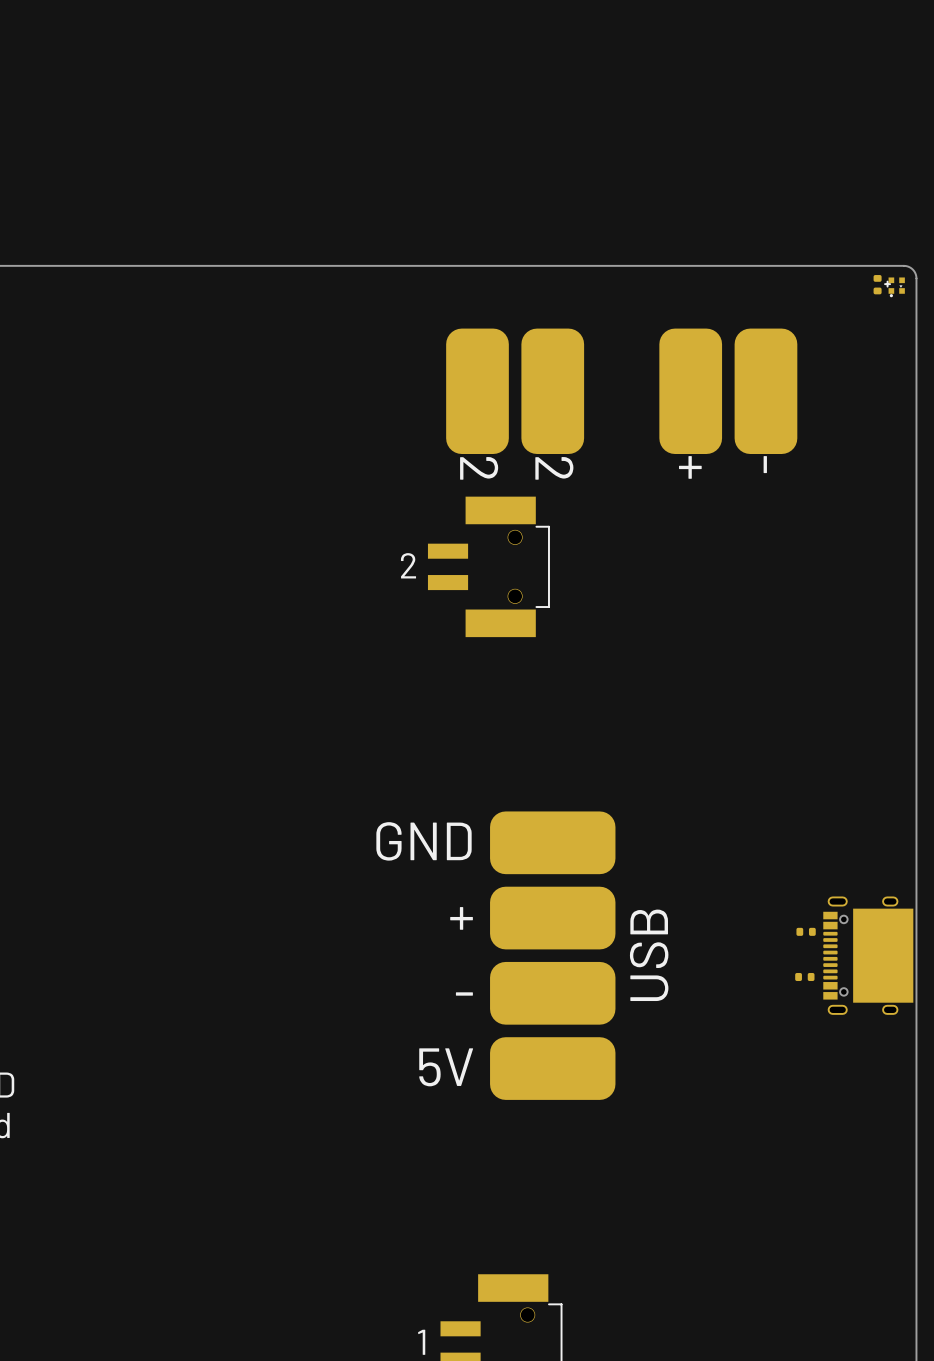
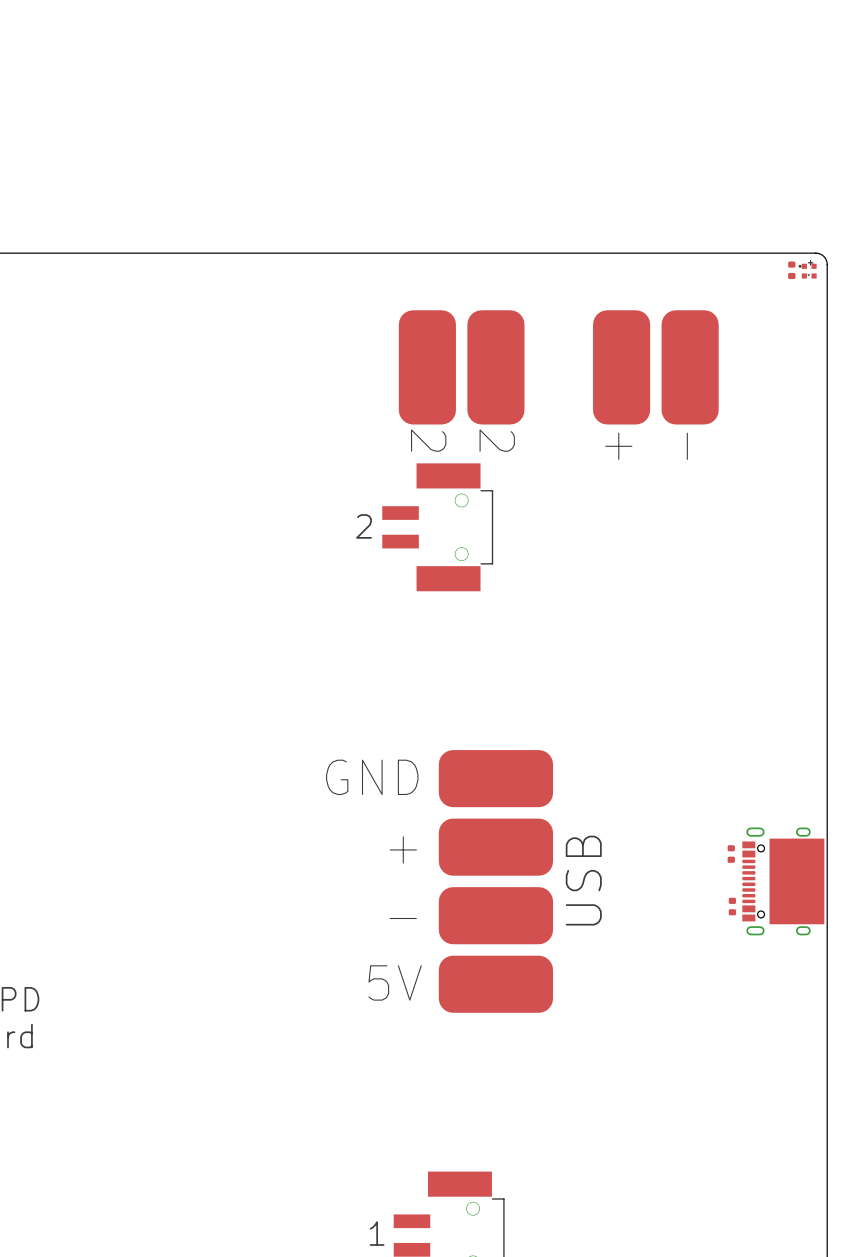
part rotation: 0° (894, 287) -> 90° clockwise (807, 269)
part rotation: 0° (806, 931) -> 90° clockwise (731, 854)
part rotation: 0° (804, 977) -> 90° clockwise (732, 906)

